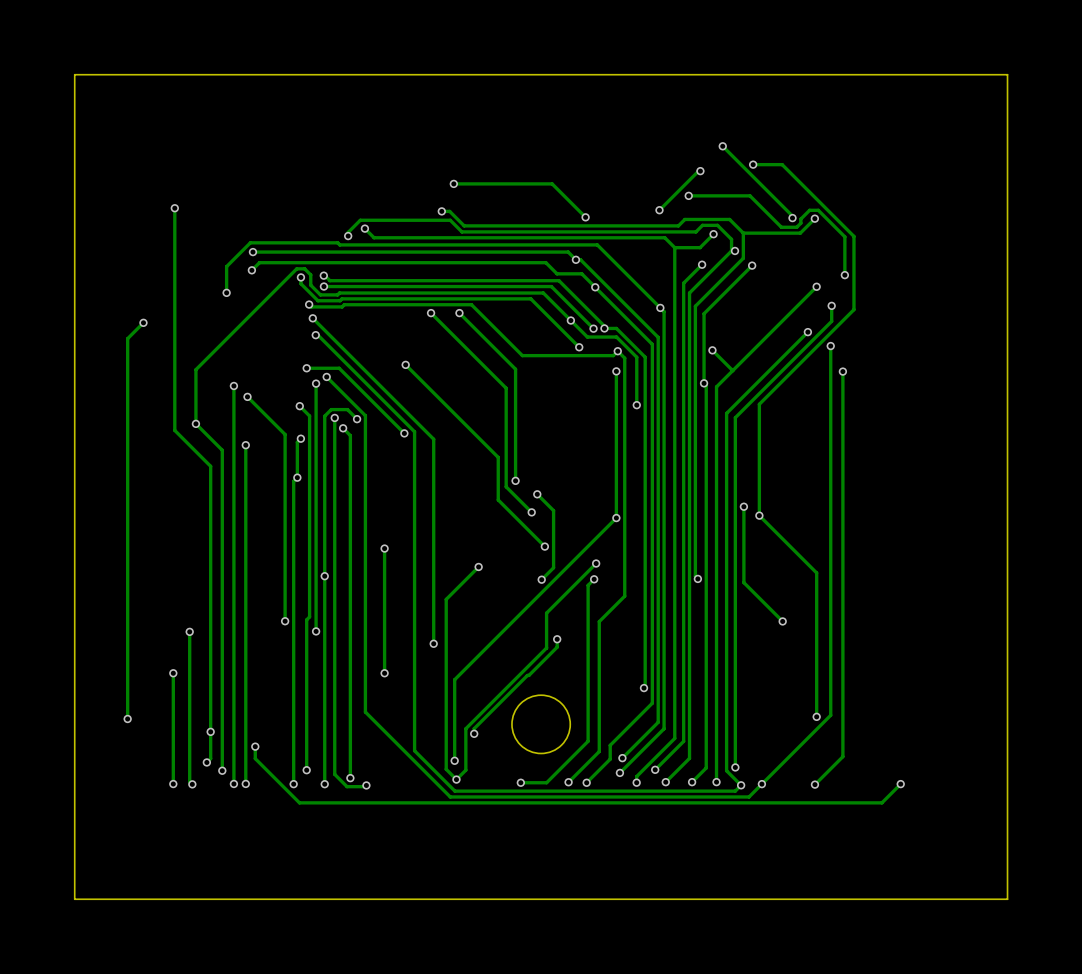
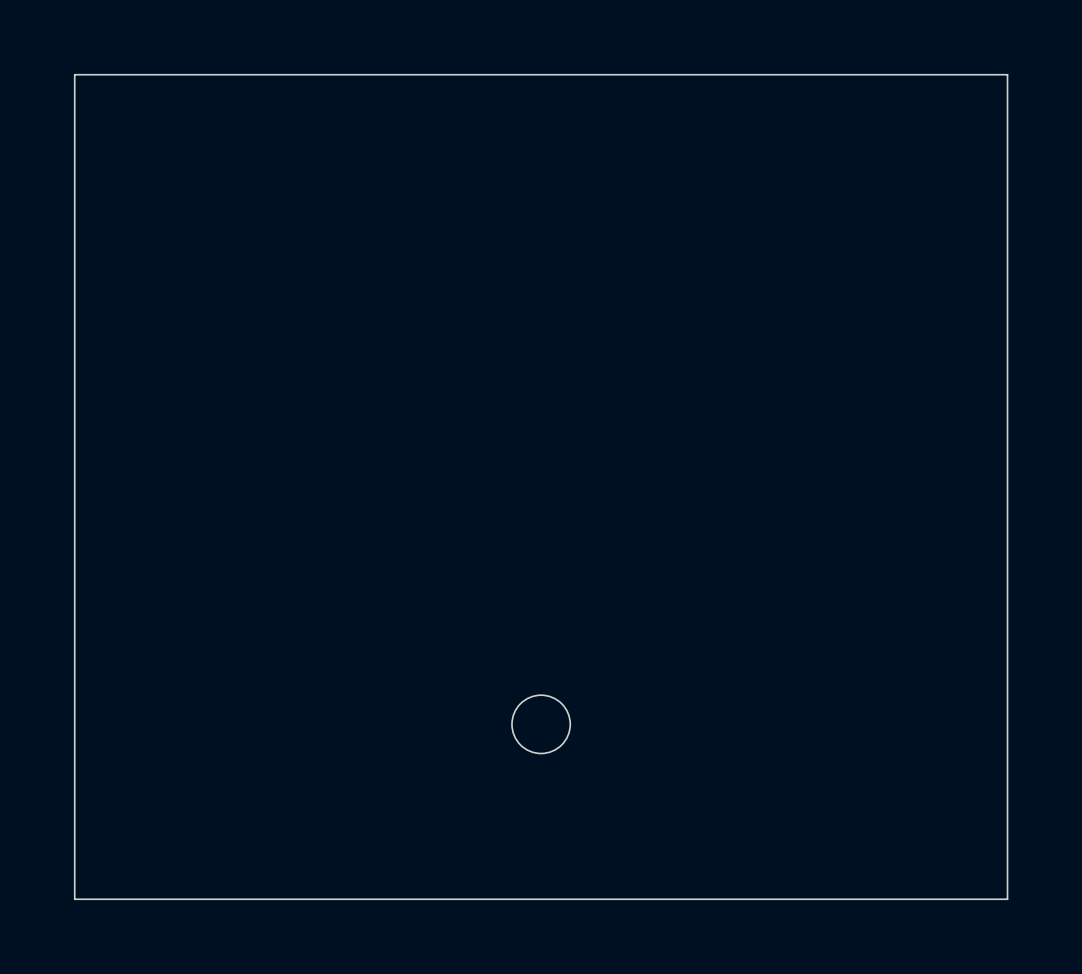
track: (722, 146) (792, 218) -> none
via: (722, 146) -> none
track: (753, 164) (782, 164) (853, 236) (853, 309) (759, 404) (759, 515) (816, 572) (816, 716) -> none
via: (753, 164) -> none
track: (700, 171) (659, 210) -> none
via: (700, 171) -> none
track: (453, 183) (552, 183) (585, 217) -> none
via: (453, 183) -> none
track: (688, 195) (750, 195) (781, 227) (796, 227) (800, 223) (800, 219) (809, 210) (818, 210) (844, 236) (844, 275) -> none
via: (688, 195) -> none
track: (174, 208) (174, 430) (210, 466) (210, 758) (206, 762) -> none
via: (174, 208) -> none
via: (659, 210) -> none
track: (441, 211) (449, 211) (464, 225) (678, 225) (684, 219) (729, 219) (743, 233) -> none
via: (441, 211) -> none
via: (585, 217) -> none
via: (792, 218) -> none
track: (814, 218) (800, 233) (743, 233) -> none
via: (814, 218) -> none
track: (364, 228) (374, 237) (664, 237) (674, 247) -> none
via: (364, 228) -> none
track: (743, 233) (743, 258) (695, 306) (695, 576) (697, 578) -> none
track: (713, 234) (700, 247) (674, 247) -> none
via: (713, 234) -> none
track: (348, 236) (348, 232) (360, 220) (450, 220) (461, 231) (695, 231) (702, 225) (717, 225) (731, 239) (731, 250) -> none
via: (348, 236) -> none
track: (674, 247) (674, 738) (636, 776) (636, 782) -> none
track: (731, 250) (689, 293) (689, 758) (665, 782) -> none
via: (734, 250) -> none
track: (252, 252) (568, 252) (575, 259) (580, 259) (658, 337) (658, 722) (622, 758) -> none
via: (252, 252) -> none
via: (575, 259) -> none
track: (702, 264) (683, 283) (683, 741) (655, 769) -> none
via: (702, 264) -> none
track: (752, 265) (704, 313) (704, 383) (706, 385) (706, 768) (692, 782) -> none
via: (752, 265) -> none
track: (251, 270) (259, 262) (545, 262) (557, 273) (581, 273) (652, 344) (652, 703) (610, 745) (610, 759) (586, 782) -> none
via: (251, 270) -> none
track: (323, 275) (329, 280) (558, 280) (604, 326) (604, 328) (616, 328) (645, 357) (644, 688) -> none
via: (323, 275) -> none
via: (844, 275) -> none
track: (300, 277) (300, 283) (317, 300) (340, 300) (341, 298) (530, 298) (579, 347) -> none
via: (300, 277) -> none
track: (323, 286) (551, 286) (593, 328) -> none
via: (323, 286) -> none
track: (816, 286) (716, 386) (716, 782) -> none
via: (816, 286) -> none
via: (595, 287) -> none
track: (226, 292) (226, 266) (250, 242) (337, 242) (339, 244) (597, 244) (664, 311) (664, 728) (619, 772) -> none
via: (226, 292) -> none
track: (309, 304) (311, 306) (342, 306) (344, 304) (471, 304) (522, 355) (613, 355) (617, 351) (624, 358) (624, 596) (599, 621) (599, 751) (568, 782) -> none
via: (309, 304) -> none
track: (831, 305) (831, 321) (735, 417) (735, 767) -> none
via: (831, 305) -> none
via: (660, 307) -> none
track: (431, 313) (506, 388) (506, 486) (531, 512) -> none
via: (431, 313) -> none
track: (459, 313) (515, 369) (515, 480) -> none
via: (459, 313) -> none
track: (312, 318) (433, 439) (433, 643) -> none
via: (312, 318) -> none
via: (570, 320) -> none
track: (143, 322) (127, 338) (127, 718) -> none
via: (143, 322) -> none
via: (593, 328) -> none
via: (604, 328) -> none
track: (807, 332) (726, 413) (726, 770) (741, 785) (735, 791) (454, 791) (414, 750) (414, 431) (317, 335) (315, 335) -> none
via: (807, 332) -> none
via: (315, 335) -> none
track: (830, 346) (830, 715) (749, 796) (450, 796) (365, 712) (365, 415) (326, 376) -> none
via: (830, 346) -> none
via: (579, 347) -> none
track: (712, 350) (732, 370) -> none
via: (712, 350) -> none
via: (617, 351) -> none
track: (405, 364) (498, 457) (498, 499) (544, 546) -> none
via: (405, 364) -> none
track: (306, 368) (339, 368) (404, 433) -> none
via: (306, 368) -> none
track: (616, 371) (616, 518) (454, 679) (454, 760) -> none
via: (616, 371) -> none
track: (842, 371) (842, 756) (814, 784) -> none
via: (842, 371) -> none
via: (326, 376) -> none
track: (316, 383) (316, 631) -> none
via: (316, 383) -> none
via: (704, 383) -> none
track: (233, 385) (233, 783) -> none
via: (233, 385) -> none
track: (247, 396) (285, 434) (285, 621) -> none
via: (247, 396) -> none
track: (636, 405) (636, 357) (616, 337) (587, 337) (543, 293) (339, 293) (337, 294) (320, 294) (310, 285) (310, 274) (304, 268) (296, 268) (195, 369) (195, 423) (222, 450) (222, 770) -> none
via: (636, 405) -> none
track: (299, 406) (309, 416) (309, 616) (306, 619) (306, 770) -> none
via: (299, 406) -> none
track: (334, 417) (334, 774) (347, 786) (366, 785) -> none
via: (334, 417) -> none
track: (357, 419) (347, 409) (331, 409) (324, 416) (324, 784) -> none
via: (357, 419) -> none
via: (195, 423) -> none
track: (343, 428) (350, 435) (350, 778) -> none
via: (343, 428) -> none
via: (404, 433) -> none
track: (300, 438) (297, 442) (297, 477) (293, 481) (293, 784) -> none
via: (300, 438) -> none
track: (245, 445) (245, 783) -> none
via: (245, 445) -> none
via: (297, 477) -> none
via: (515, 480) -> none
track: (537, 494) (553, 510) (553, 567) (541, 579) -> none
via: (537, 494) -> none
track: (743, 506) (743, 582) (782, 621) -> none
via: (743, 506) -> none
via: (531, 512) -> none
via: (759, 515) -> none
via: (616, 518) -> none
via: (544, 546) -> none
track: (384, 548) (384, 673) -> none
via: (384, 548) -> none
track: (596, 563) (546, 613) (546, 648) (465, 728) (465, 770) (456, 779) (446, 769) (446, 599) (478, 566) -> none
via: (596, 563) -> none
via: (478, 566) -> none
via: (324, 576) -> none
via: (697, 578) -> none
via: (541, 579) -> none
track: (594, 579) (588, 585) (588, 741) (546, 782) (520, 782) -> none
via: (594, 579) -> none
via: (285, 621) -> none
via: (782, 621) -> none
track: (189, 631) (189, 781) (192, 784) -> none
via: (189, 631) -> none
via: (316, 631) -> none
track: (557, 639) (557, 647) (474, 728) (474, 733) -> none
via: (557, 639) -> none
via: (433, 643) -> none
track: (173, 673) (173, 784) -> none
via: (173, 673) -> none
via: (384, 673) -> none
via: (644, 688) -> none
via: (816, 716) -> none
via: (127, 718) -> none
via: (210, 731) -> none
via: (474, 733) -> none
track: (255, 746) (255, 758) (299, 802) (881, 802) (900, 784) -> none
via: (255, 746) -> none
via: (622, 758) -> none
via: (454, 760) -> none
via: (206, 762) -> none
via: (735, 767) -> none
via: (655, 769) -> none
via: (222, 770) -> none
via: (306, 770) -> none
via: (619, 772) -> none
via: (350, 778) -> none
via: (456, 779) -> none
via: (520, 782) -> none
via: (568, 782) -> none
via: (586, 782) -> none
via: (636, 782) -> none
via: (665, 782) -> none
via: (692, 782) -> none
via: (716, 782) -> none
via: (233, 783) -> none
via: (245, 783) -> none
via: (173, 784) -> none
via: (192, 784) -> none
via: (293, 784) -> none
via: (324, 784) -> none
via: (761, 784) -> none
via: (814, 784) -> none
via: (900, 784) -> none
via: (366, 785) -> none
via: (741, 785) -> none

